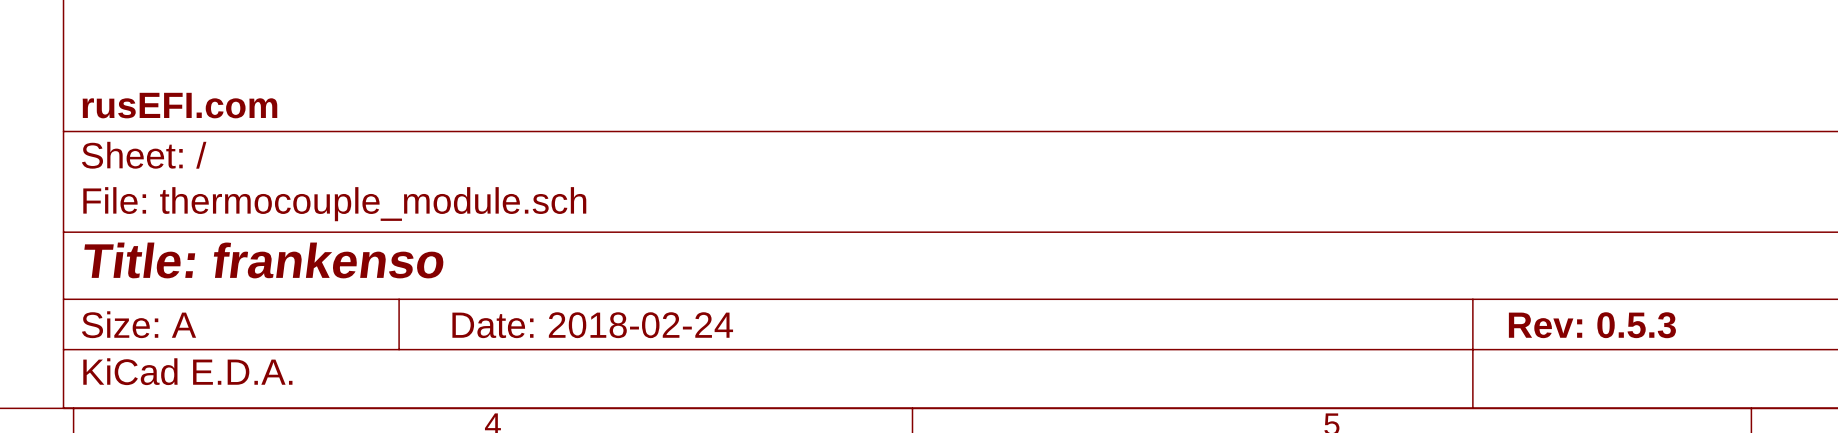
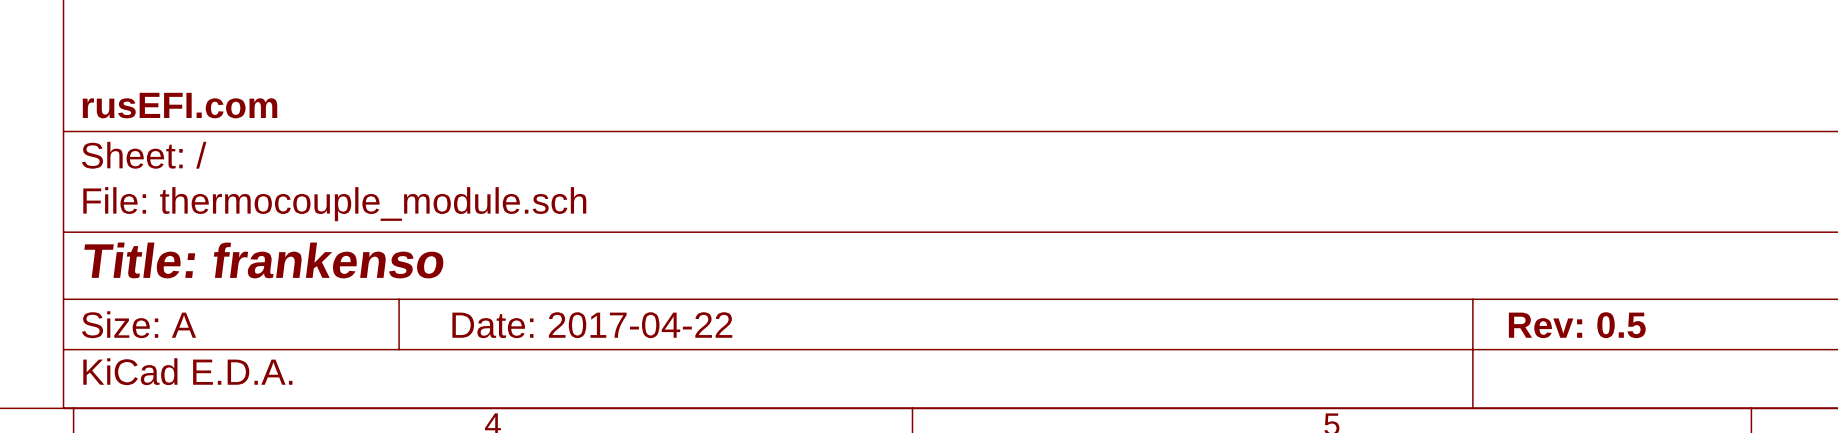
title block: Date: 2018-02-24 (592, 325) -> Date: 2017-04-22 (592, 325)
title block: Rev: 0.5.3 (1592, 325) -> Rev: 0.5 (1577, 325)

